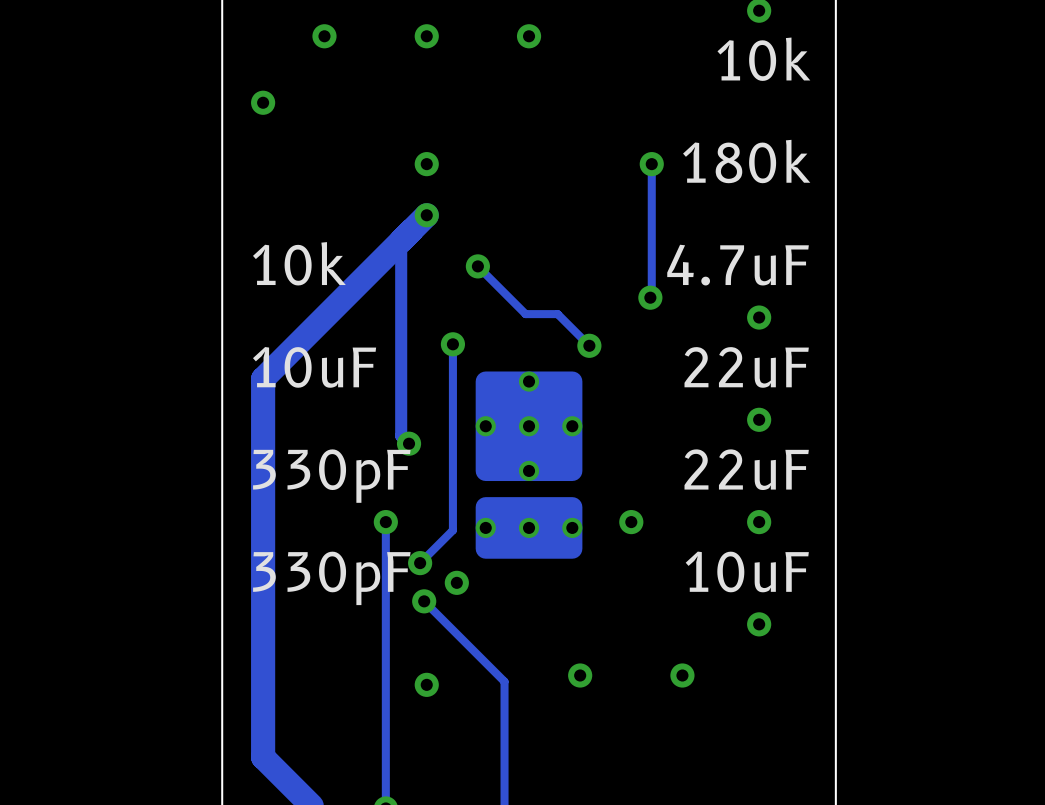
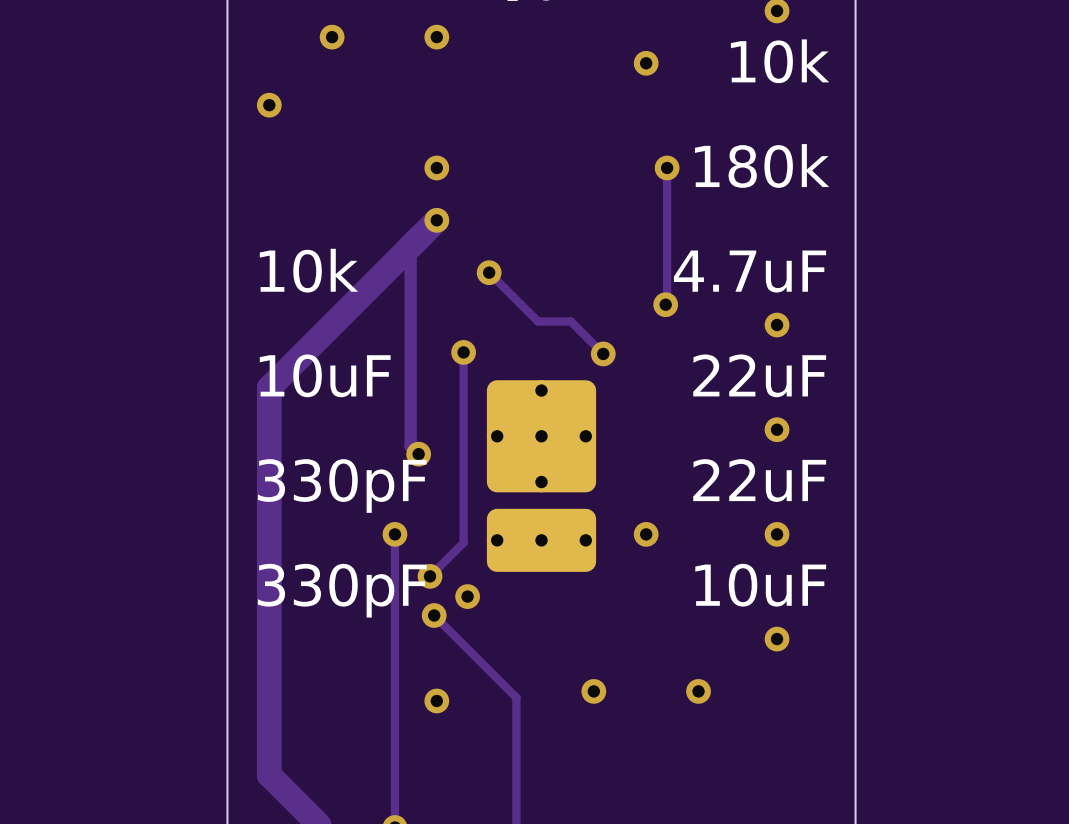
via: (529, 36) -> none
via: none -> (646, 63)

